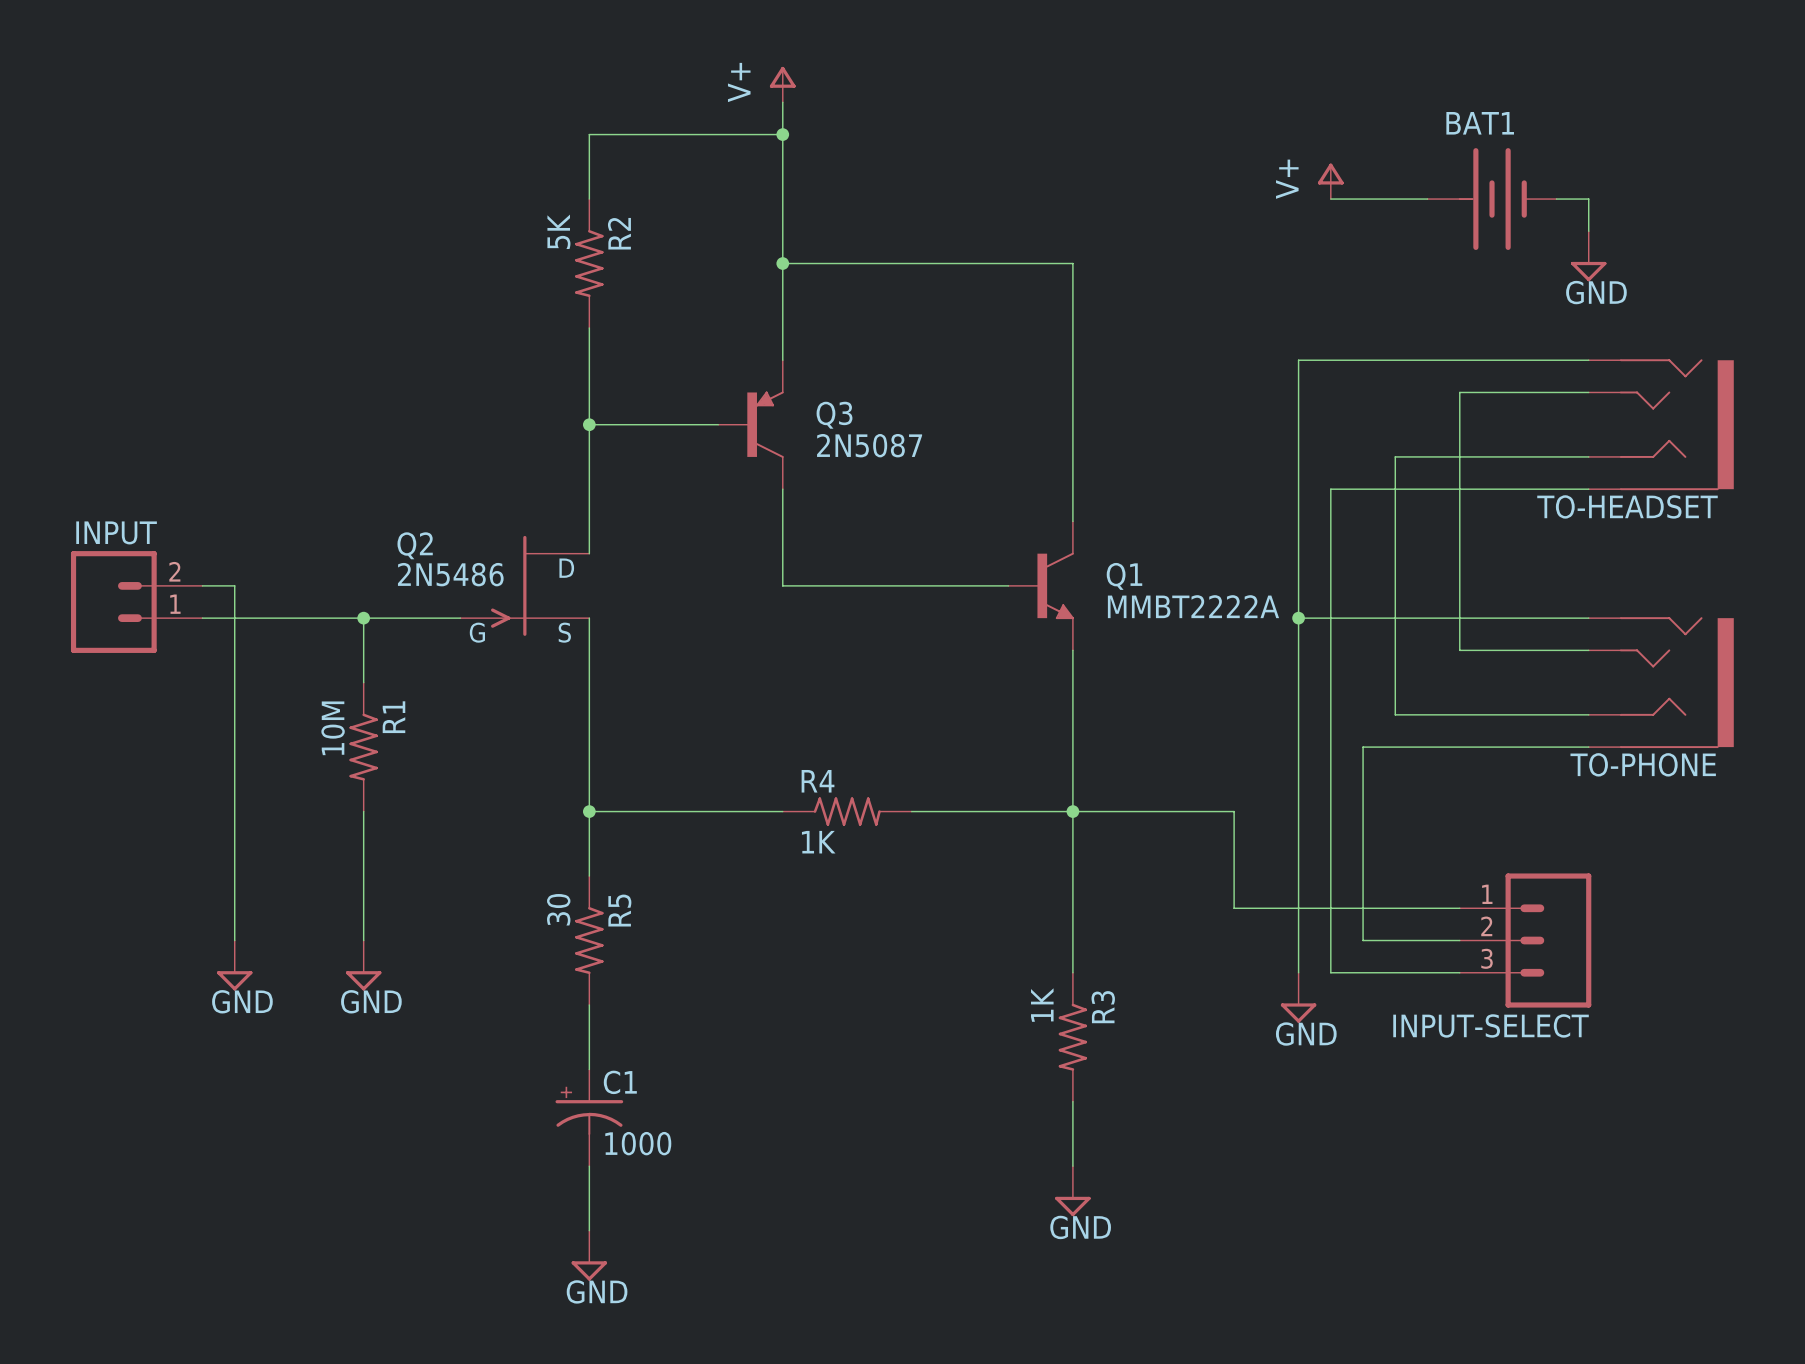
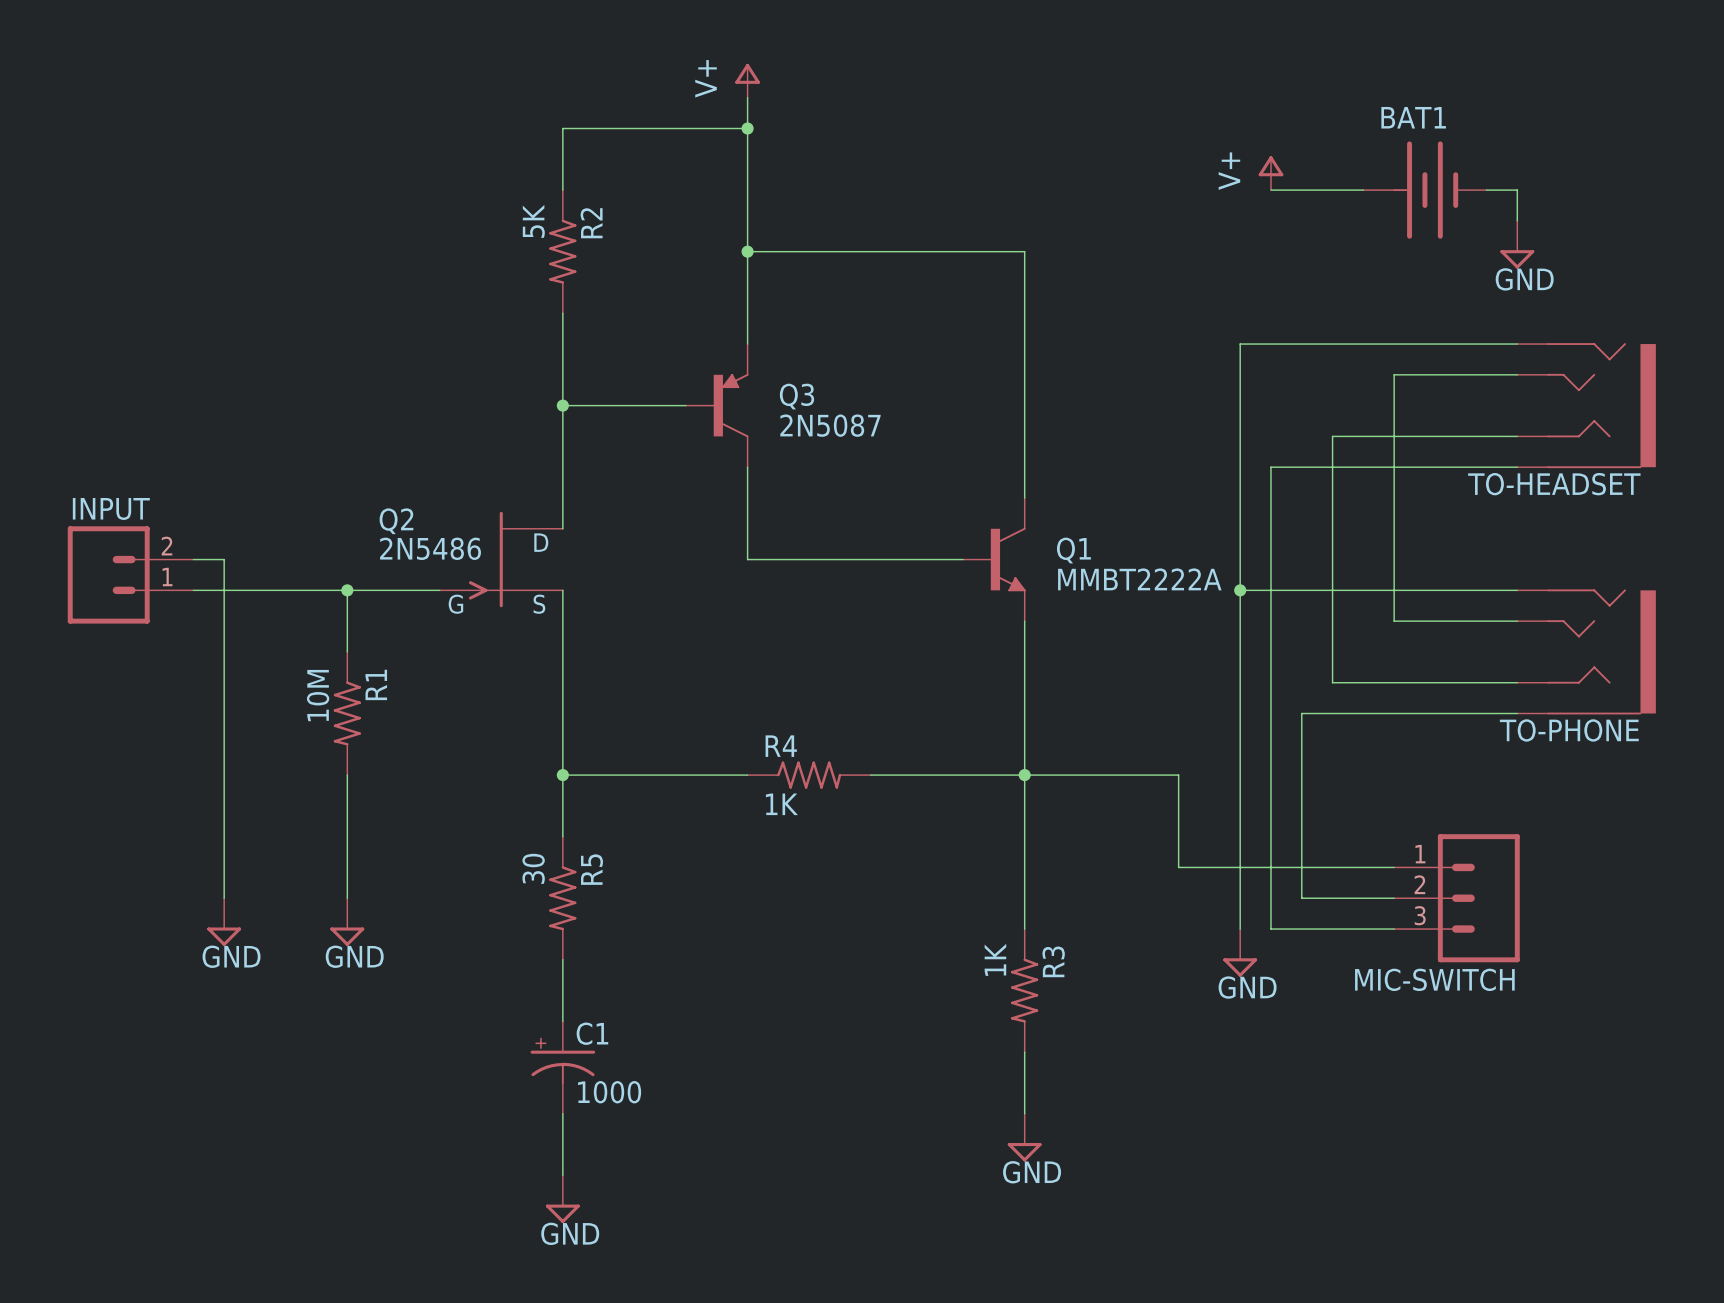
INPUT-SELECT name: INPUT-SELECT (1491, 1025) -> MIC-SWITCH (1434, 979)

